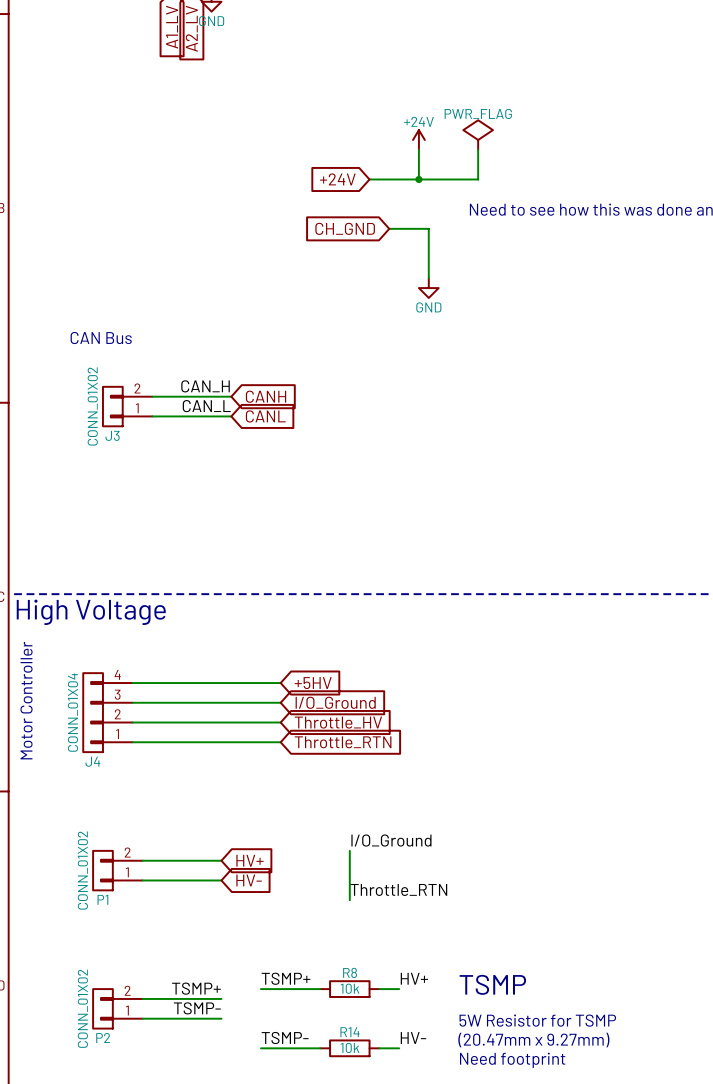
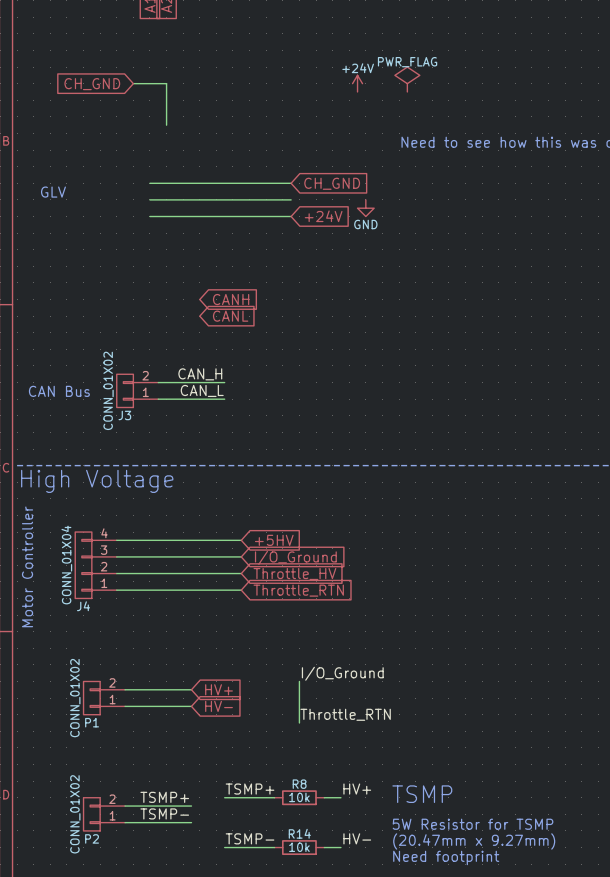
wire: none -> (133, 83) (166, 83) (166, 125)
global label: none -> CH_GND (92, 84)
wire: (418, 149) (418, 179) -> none
wire: (478, 149) (478, 179) (369, 179) -> none
global label rotation: 0° (337, 179) -> 180° (323, 216)
global label position: +24V (337, 179) -> +24V (323, 216)
junction: (418, 179) -> none
global label rotation: 0° (345, 228) -> 180° (332, 183)
wire: (389, 228) (428, 228) (428, 278) -> none
wire: none -> (149, 183) (291, 183)
text: none -> GLV (53, 192)
wire: none -> (149, 199) (291, 199)
wire: none -> (149, 216) (291, 216)
text position: CAN Bus (101, 338) -> CAN Bus (59, 391)
label position: CAN_H (205, 386) -> CAN_H (200, 374)
wire: (152, 396) (231, 396) -> (158, 382) (224, 382)
J3 position: (127, 406) -> (137, 390)
label position: CAN_L (206, 406) -> CAN_L (202, 390)
wire: (152, 416) (231, 416) -> (158, 399) (224, 399)

